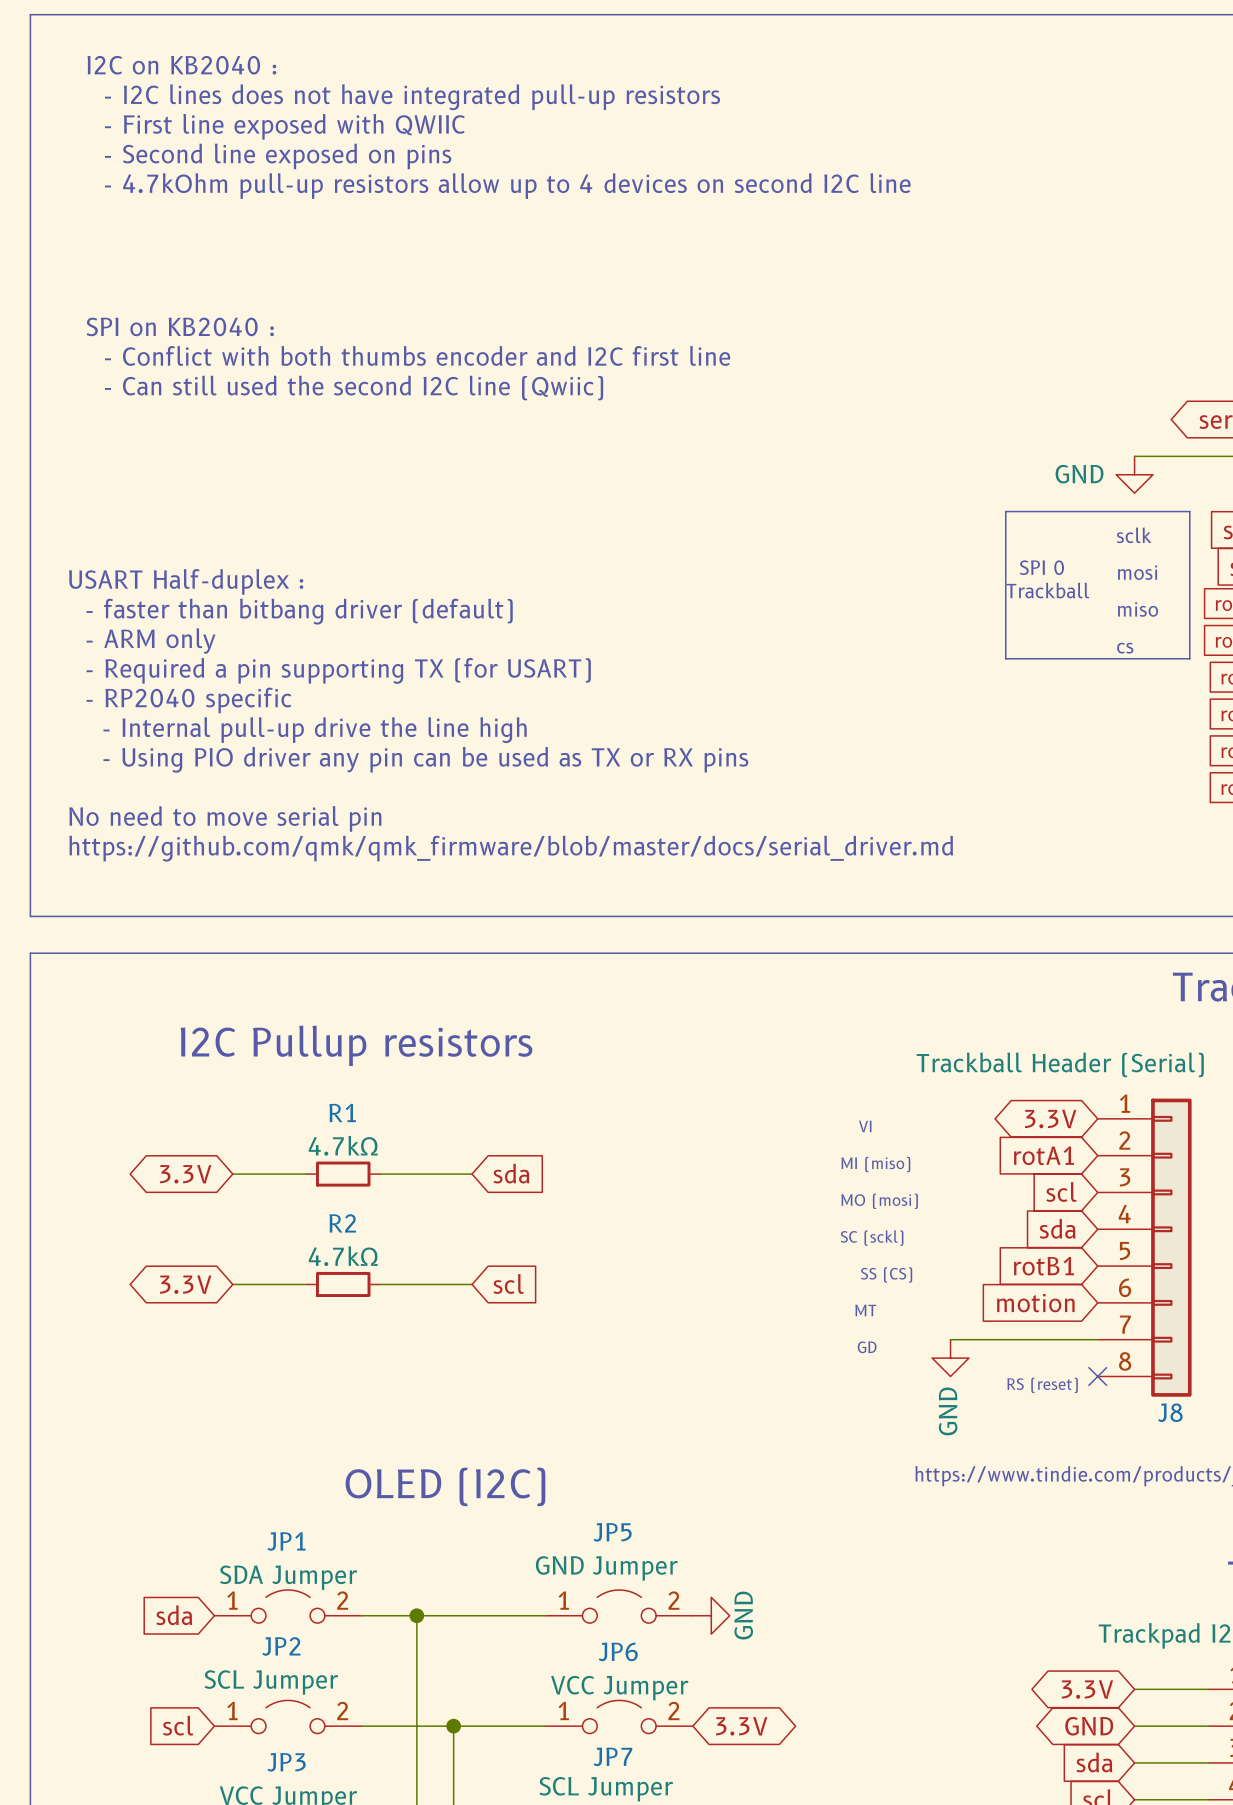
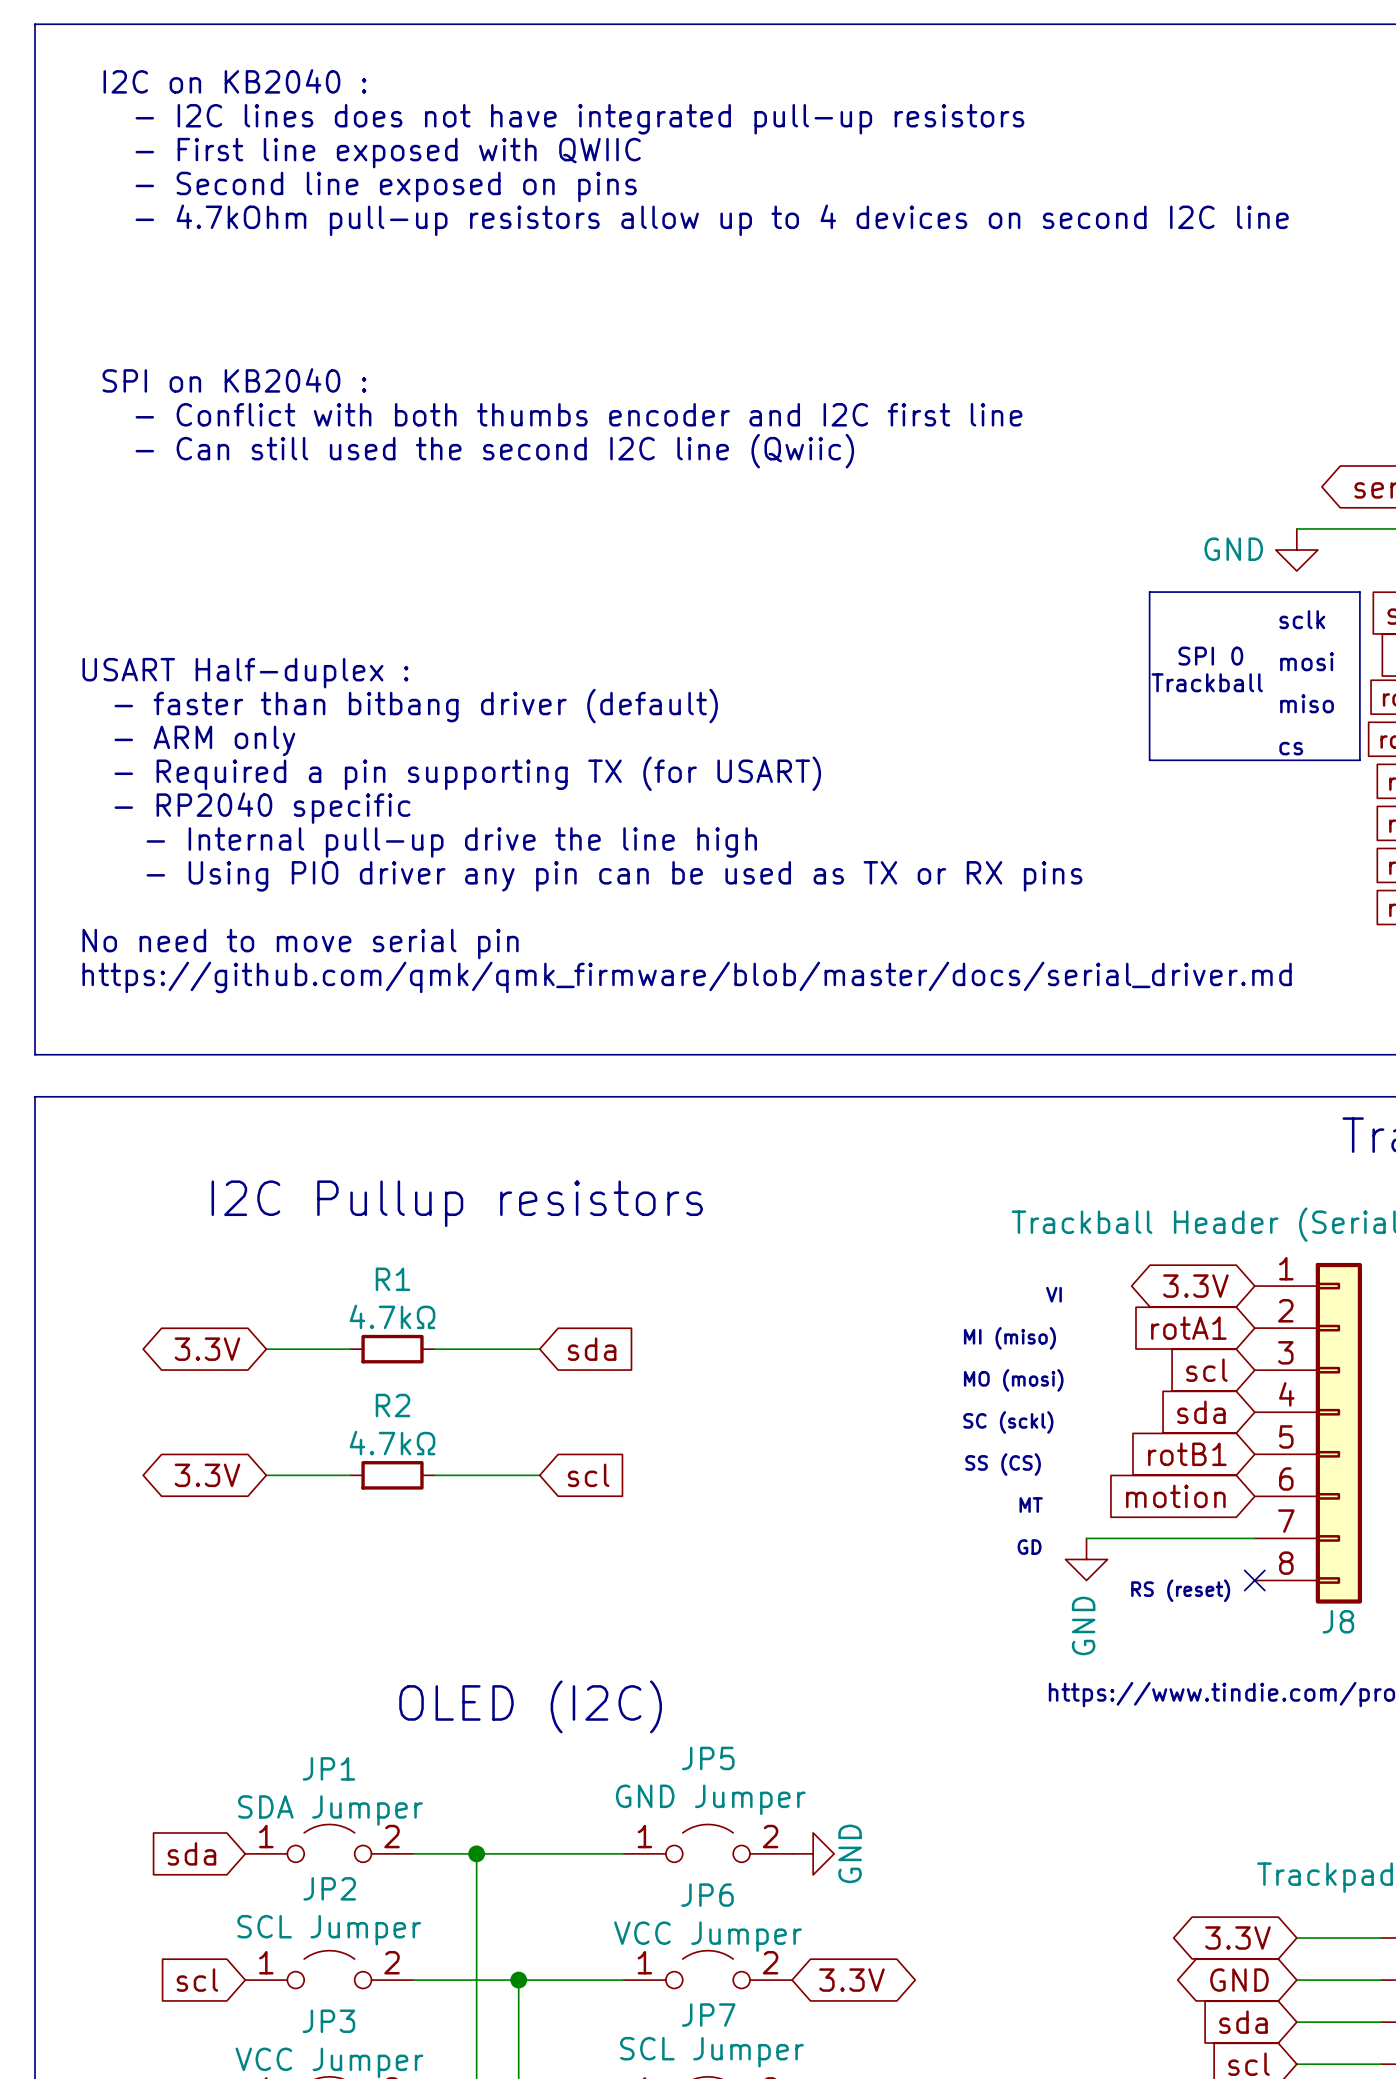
text position: VI (865, 1126) -> VI (1054, 1294)
text position: MT (865, 1310) -> MT (1031, 1505)
text position: GD (867, 1347) -> GD (1029, 1547)

